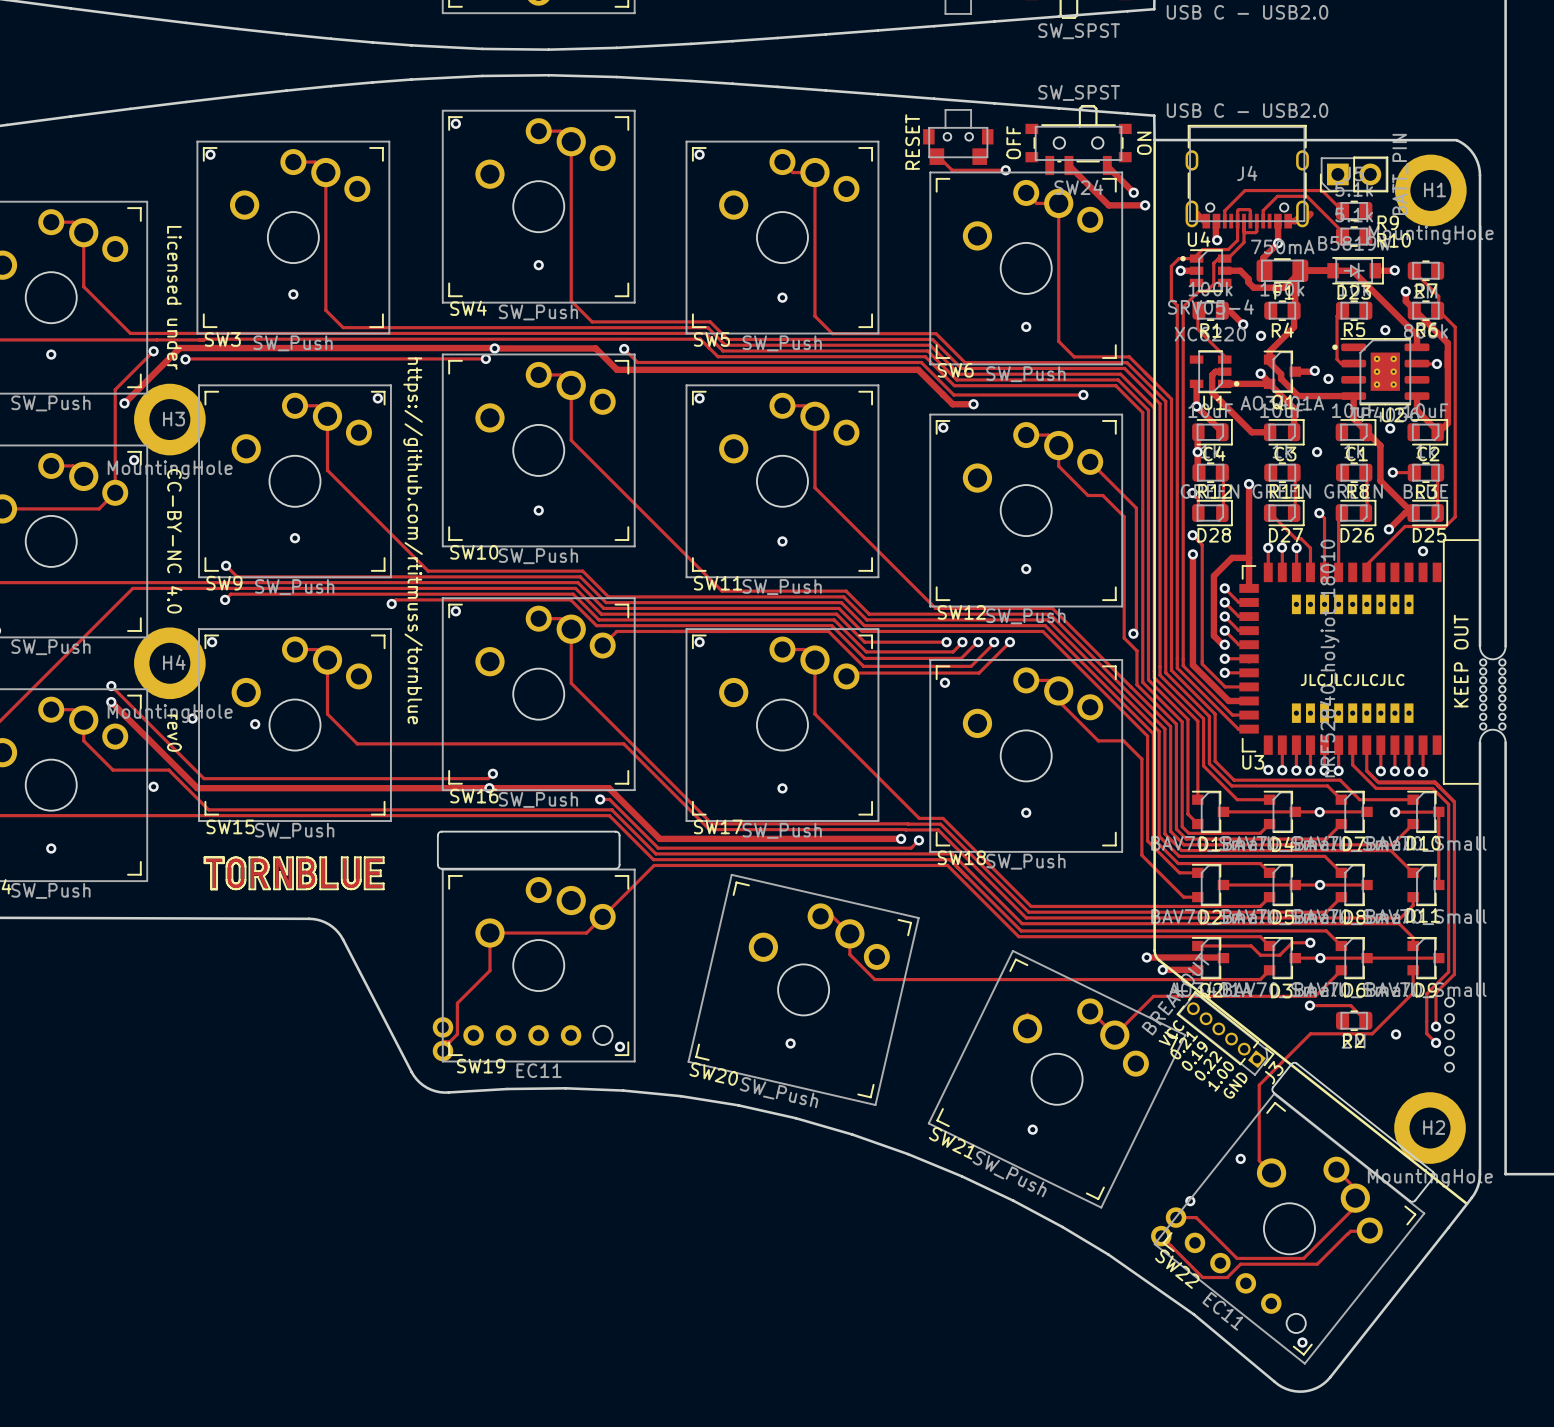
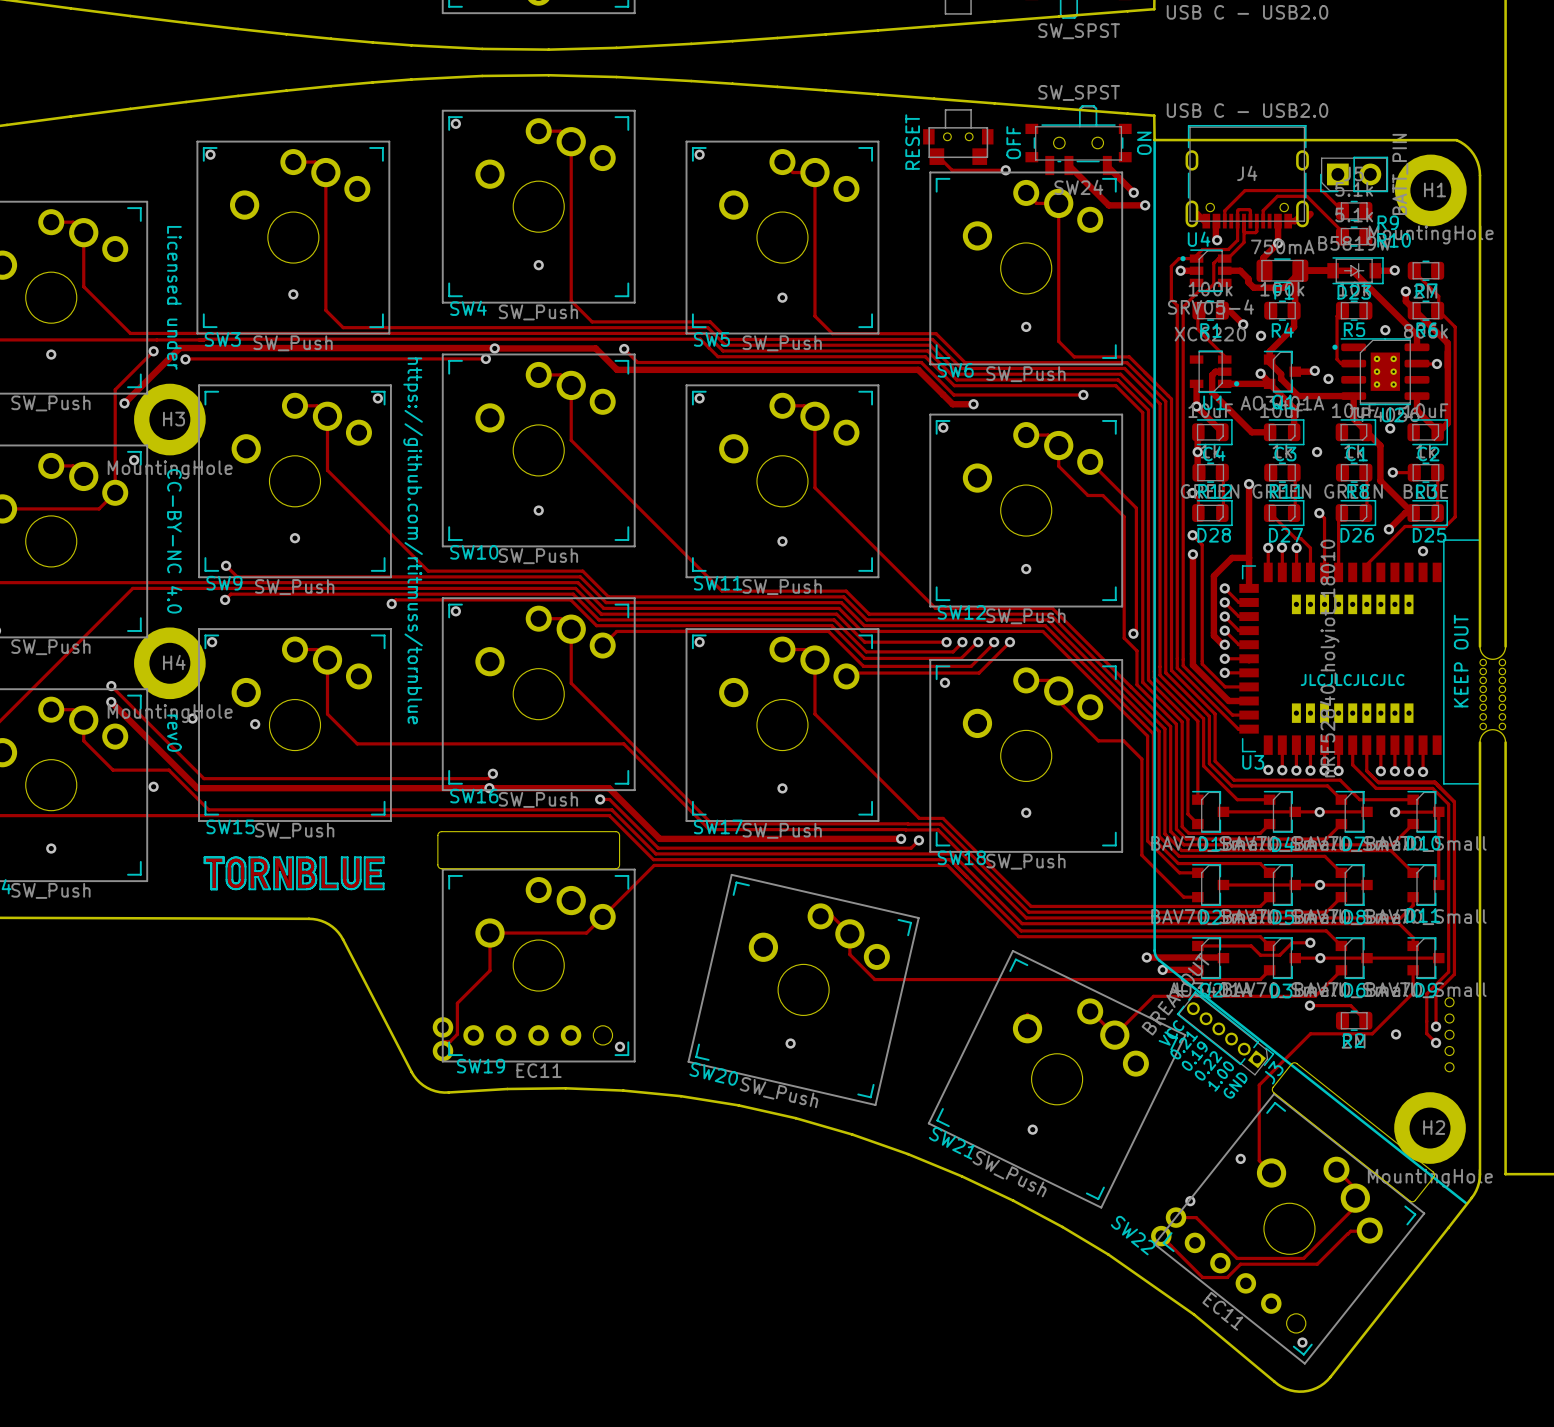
SW22 name position: SW22 (1177, 1269) -> SW22 (1133, 1235)

